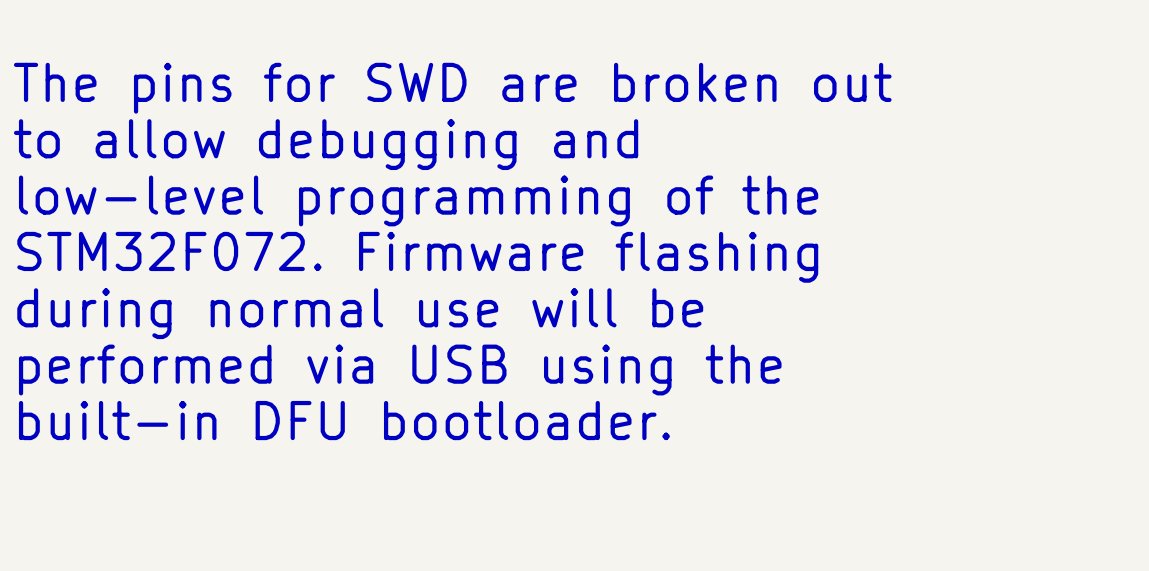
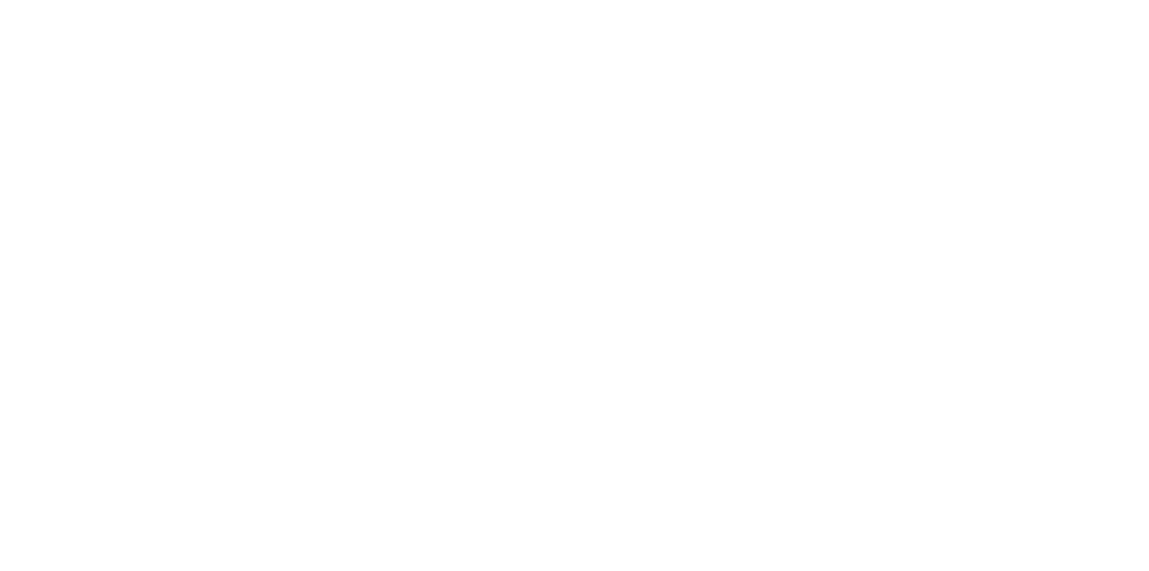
text: The pins for SWD are broken out (452, 88) -> none
text: to allow debugging and (326, 144) -> none
text: low-level programming of the (418, 200) -> none
text: STM32F072. Firmware flashing (417, 257) -> none
text: during normal use will be (360, 313) -> none
text: performed via USB using the (400, 370) -> none
text: built-in DFU bootloader. (344, 420) -> none

